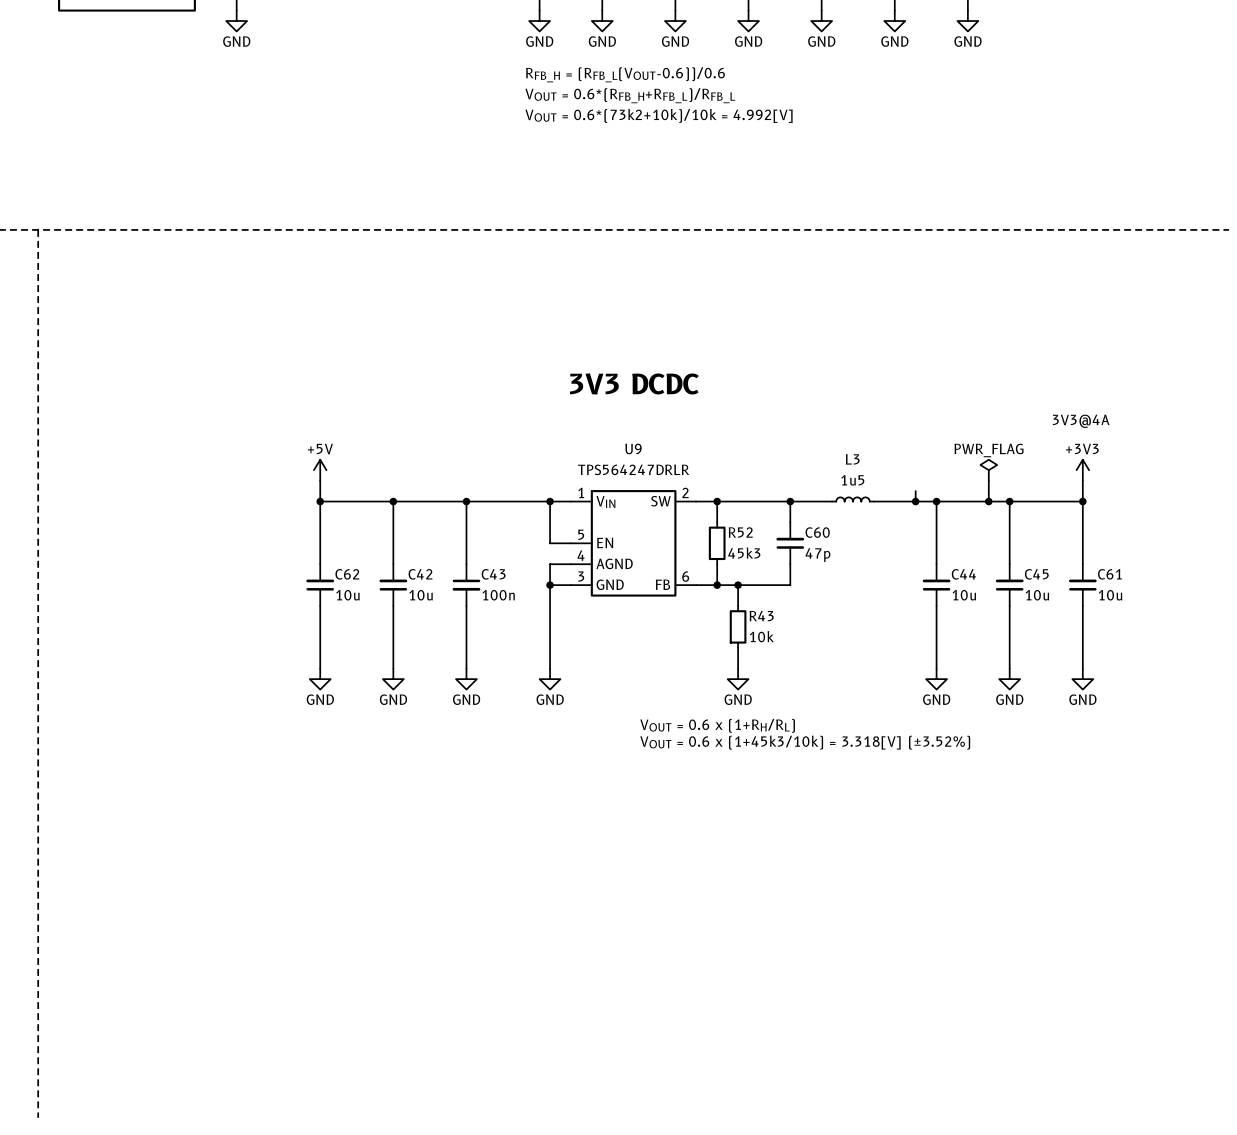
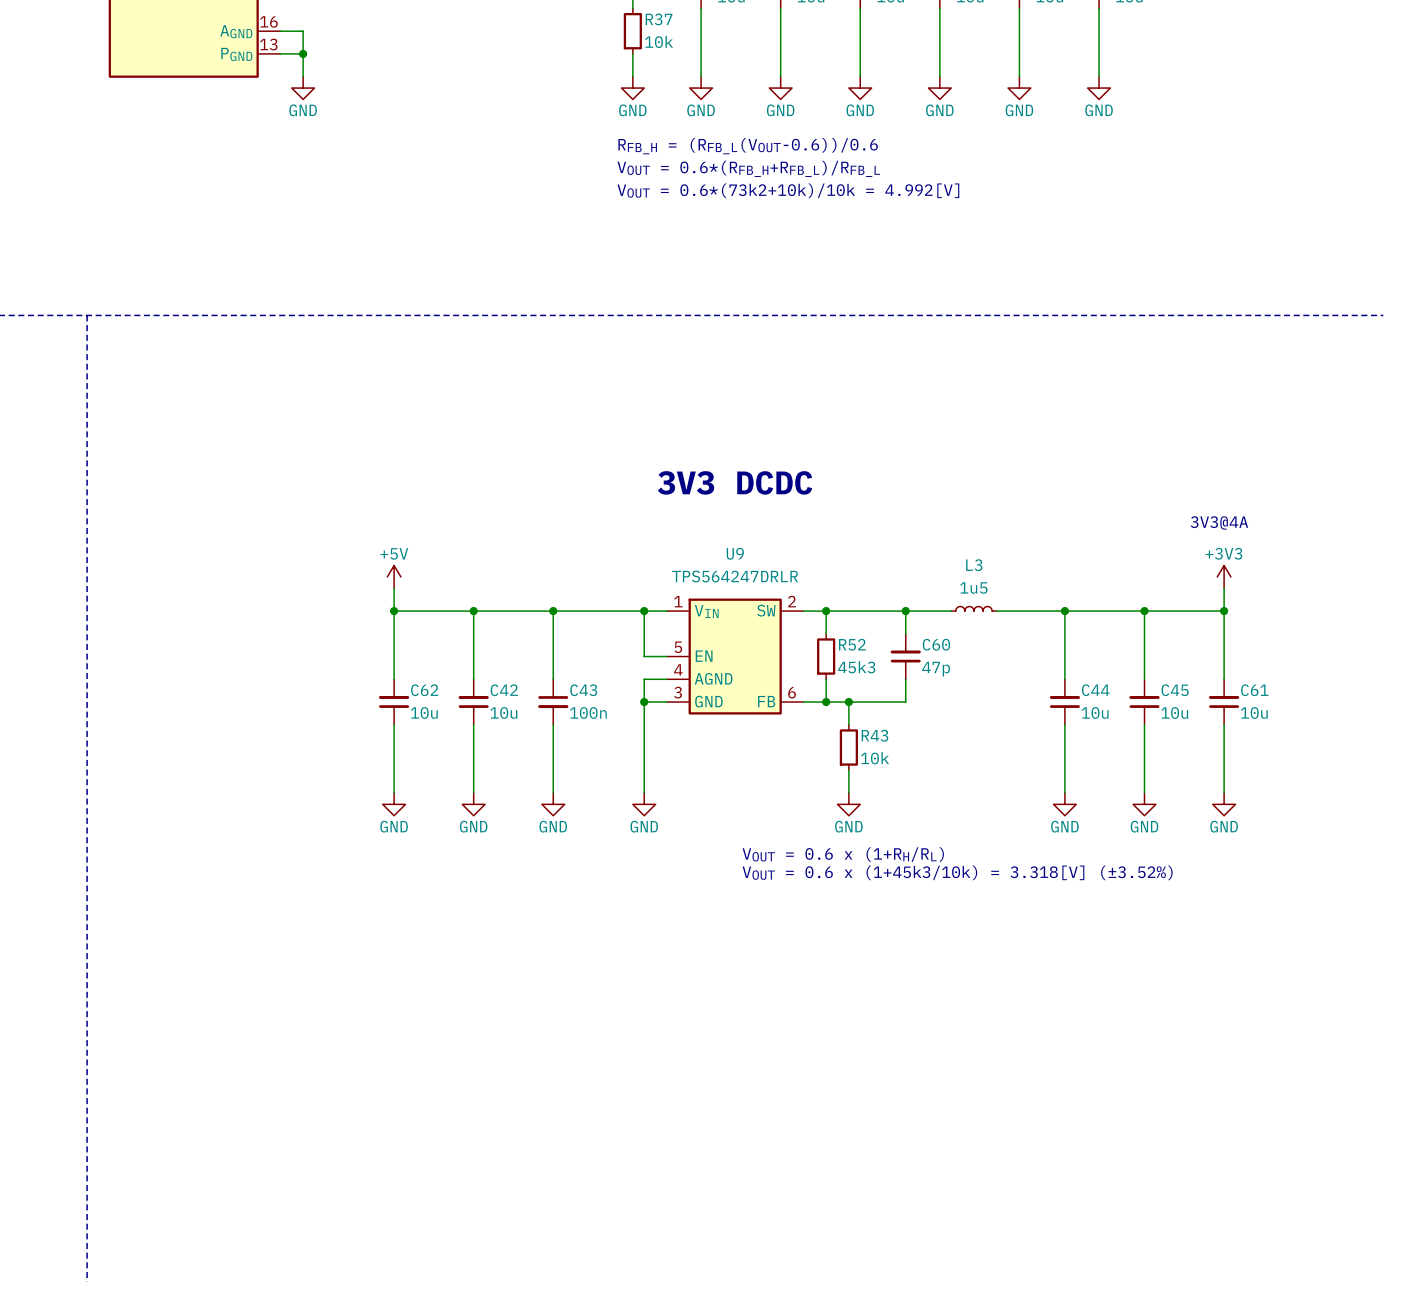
power symbol: PWR_FLAG (988, 470) -> none
wire: (988, 480) (988, 501) -> none
wire: (915, 491) (915, 501) -> none
junction: (915, 501) -> none
junction: (988, 501) -> none

